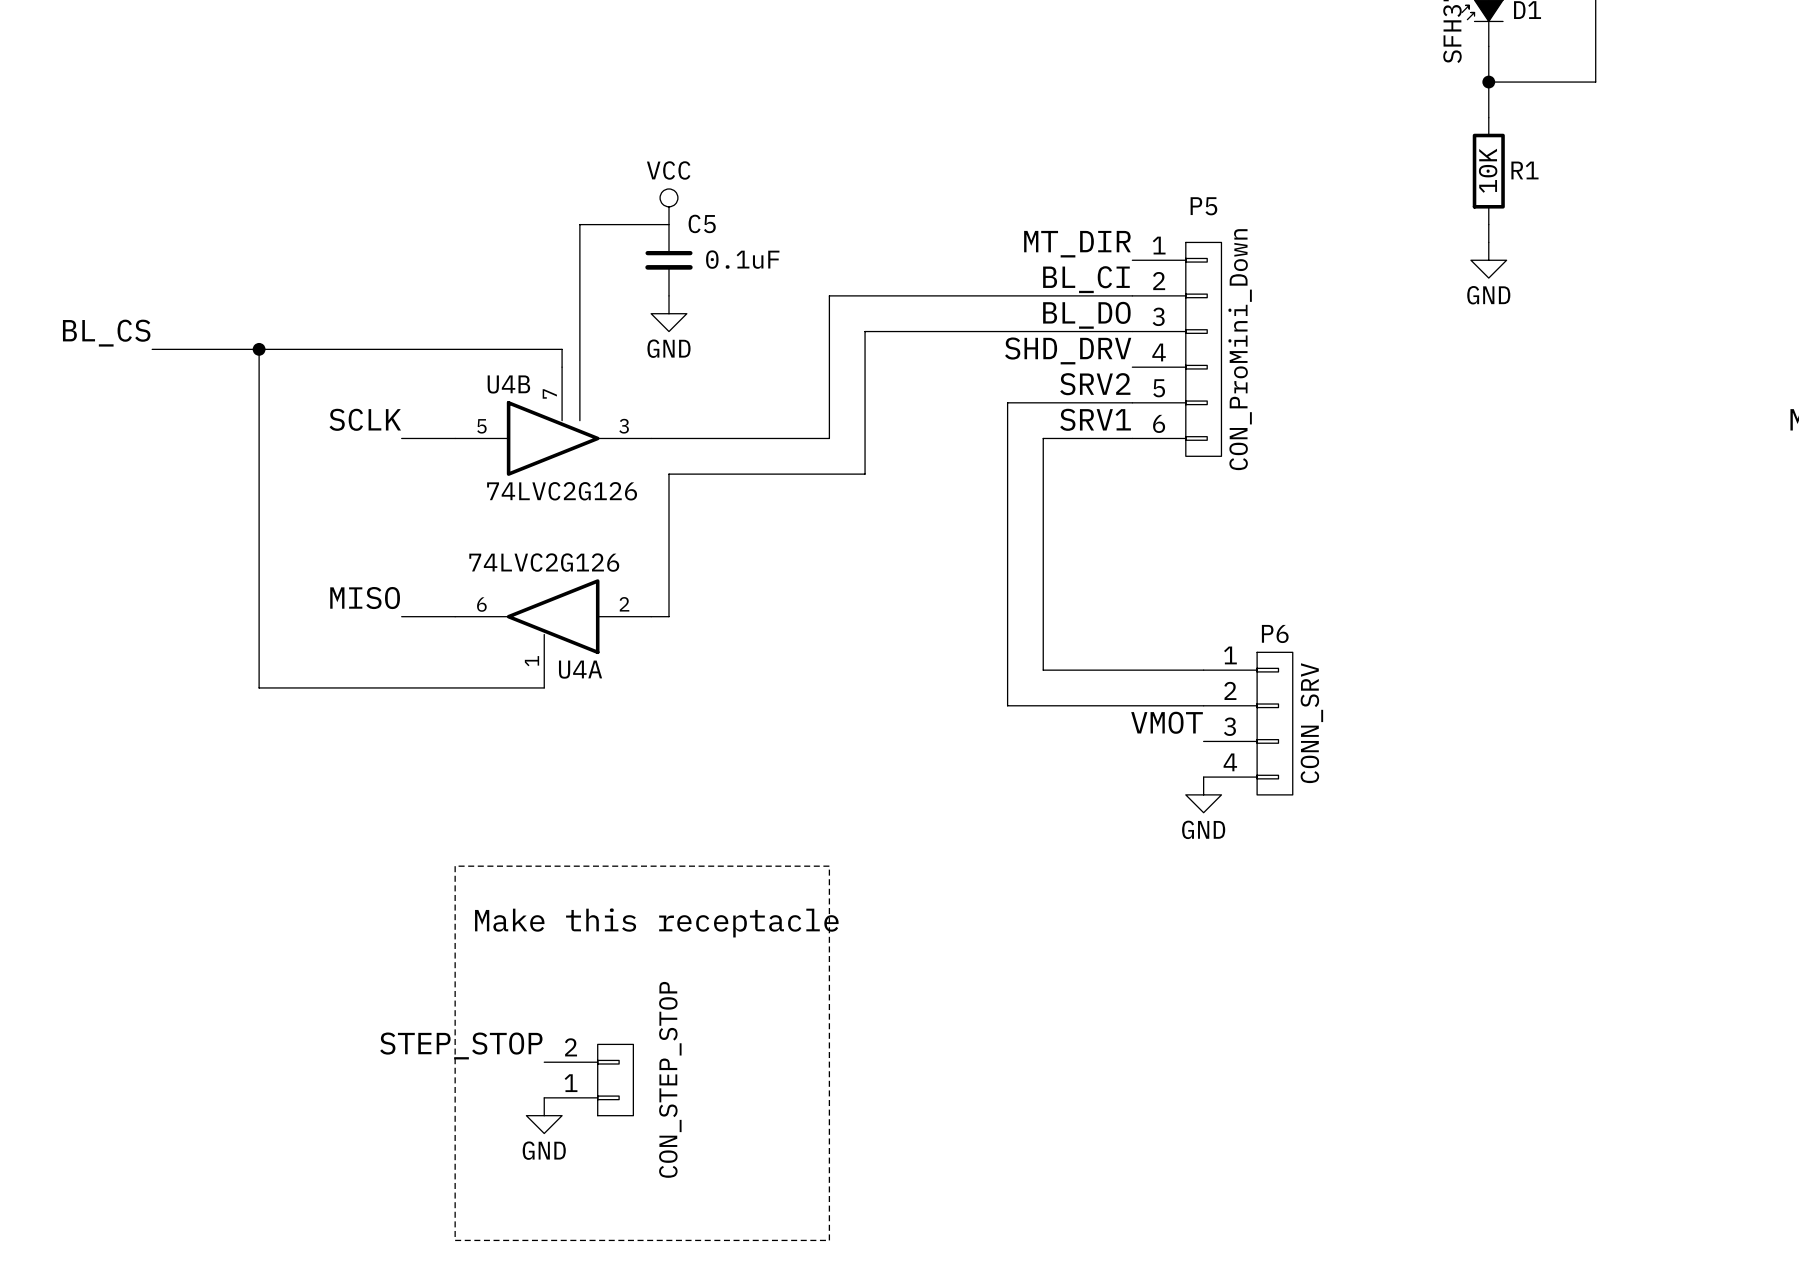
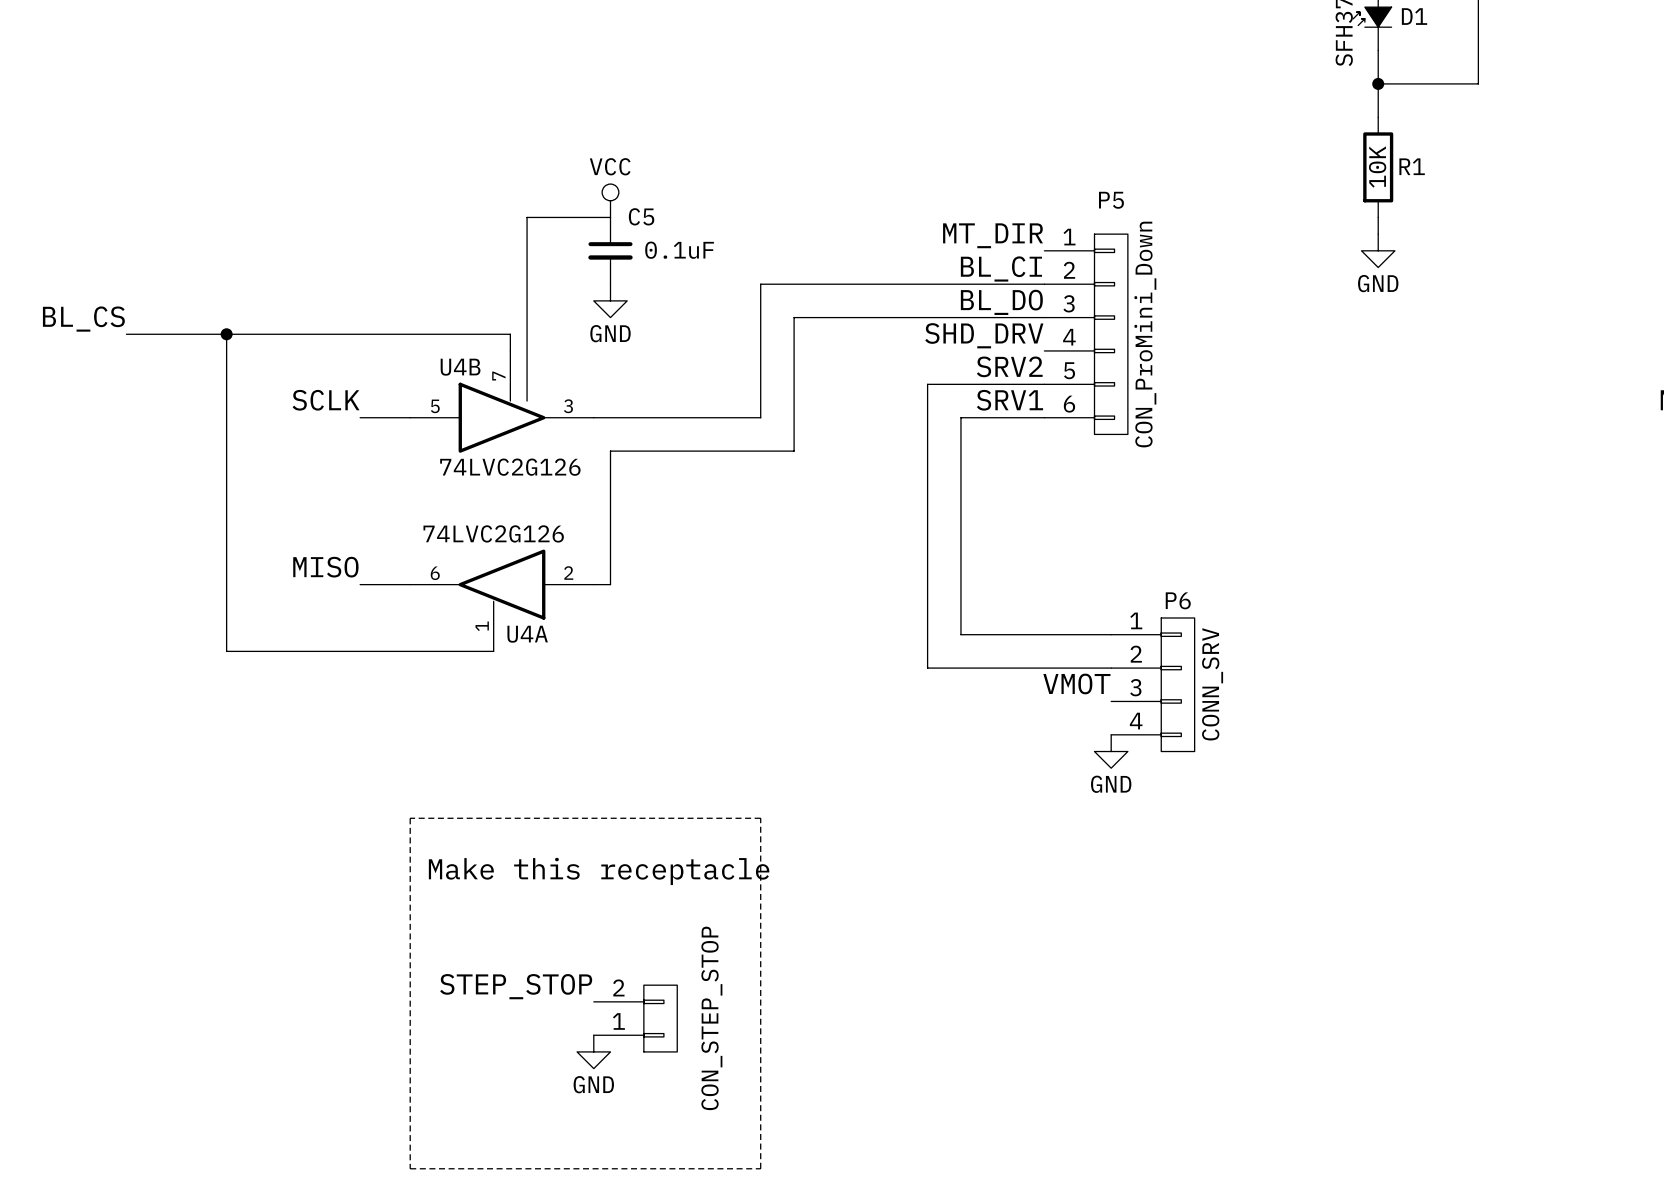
label position: STEP_STOP (461, 1045) -> STEP_STOP (516, 986)
power symbol position: CON_STEP_STOP (588, 1080) -> CON_STEP_STOP (635, 1018)
power symbol position: GND (544, 1115) -> GND (593, 1051)

